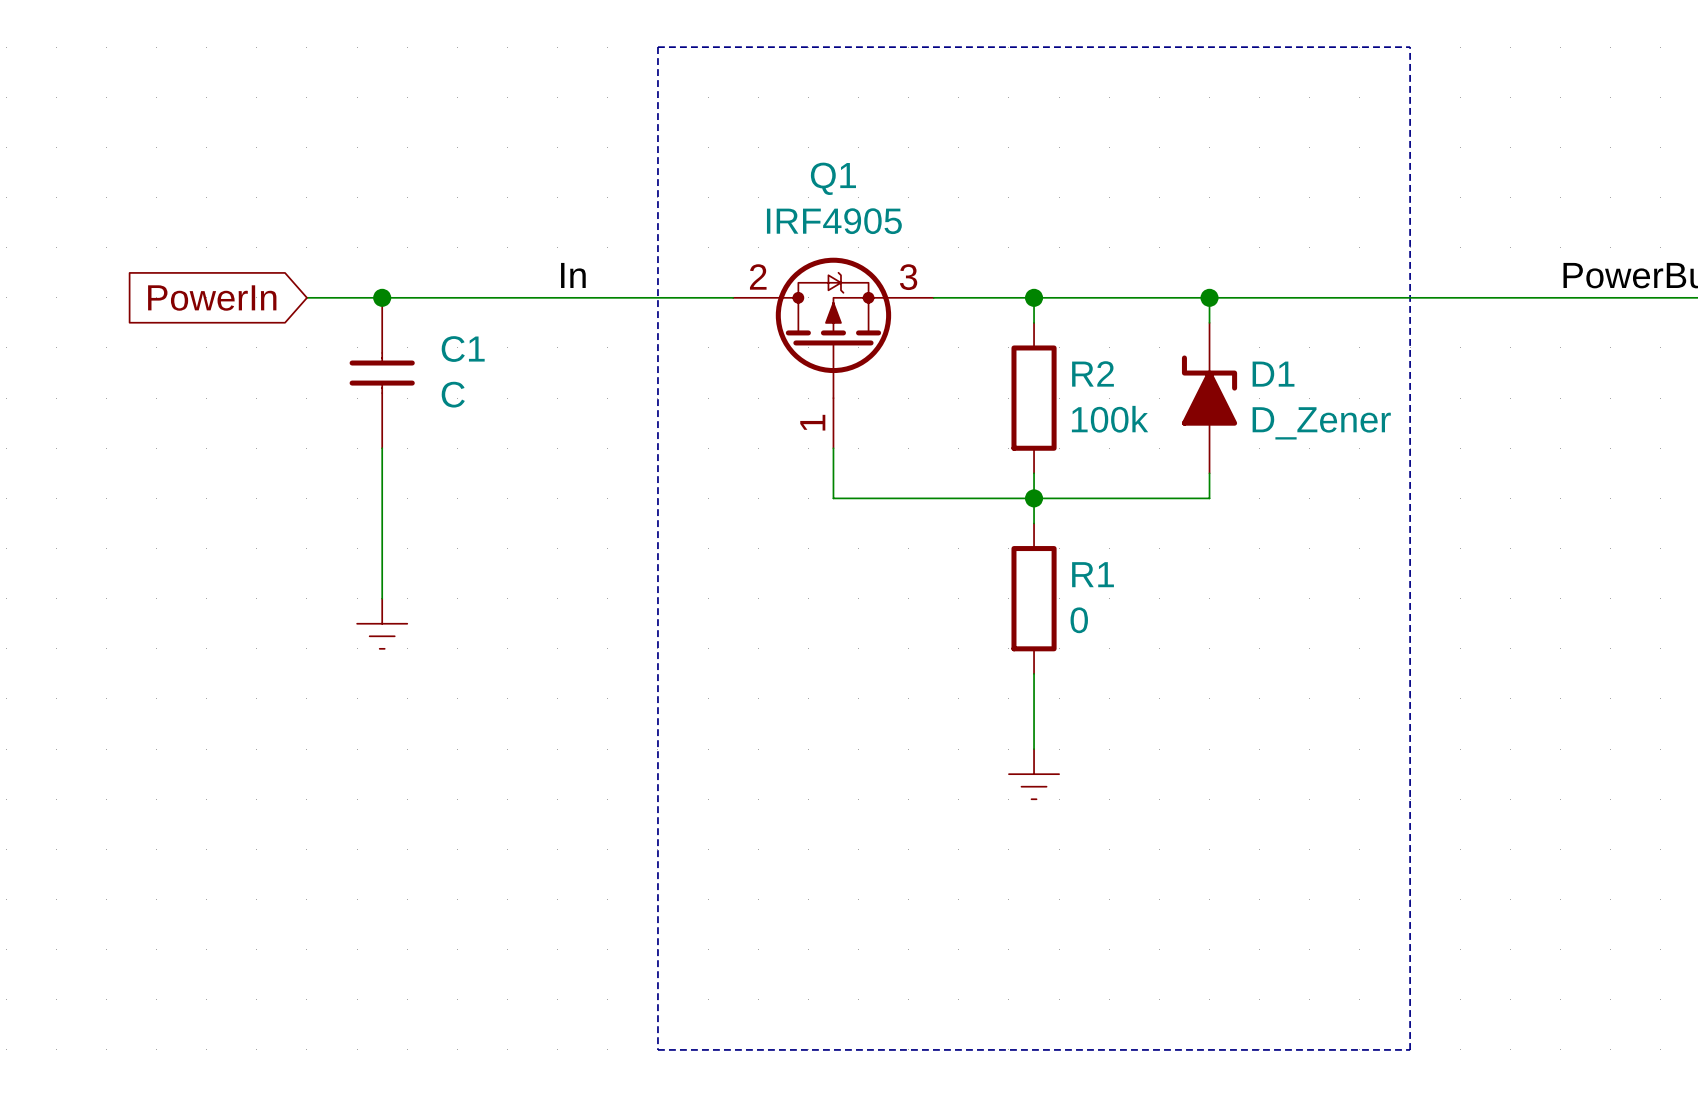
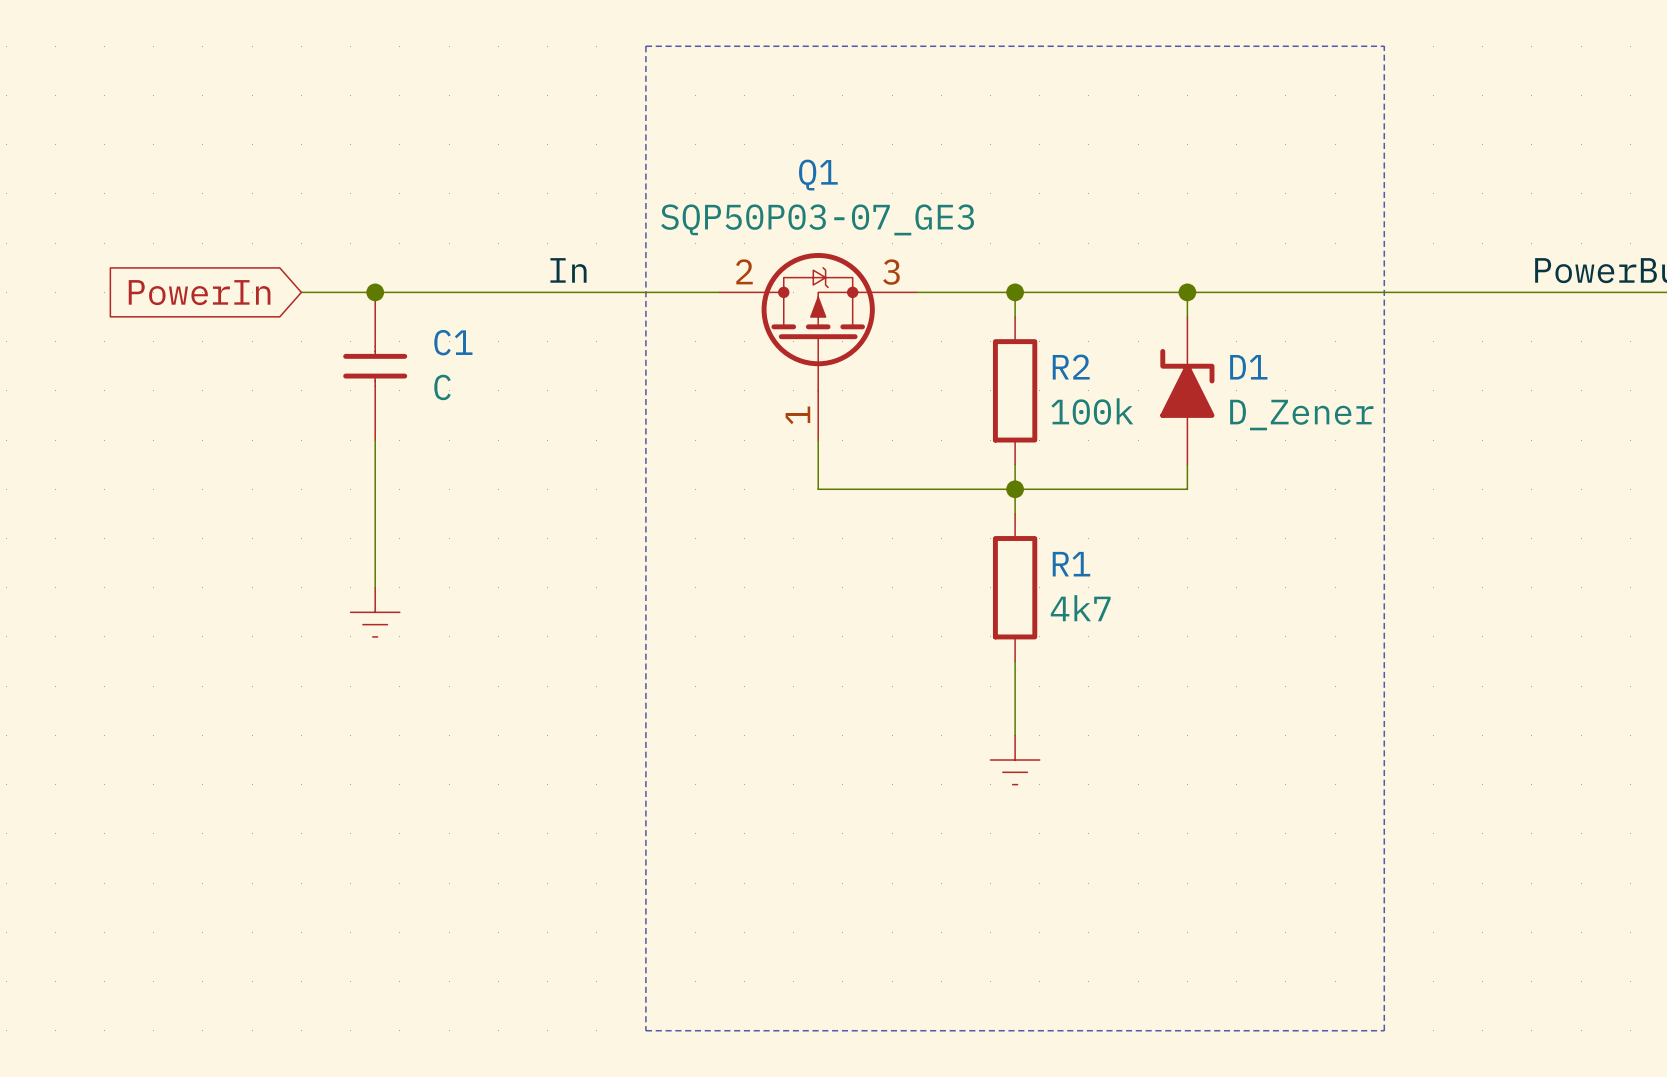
Q1 value: IRF4905 (834, 221) -> SQP50P03-07_GE3 (817, 219)
R1 value: 0 (1079, 620) -> 4k7 (1080, 608)

